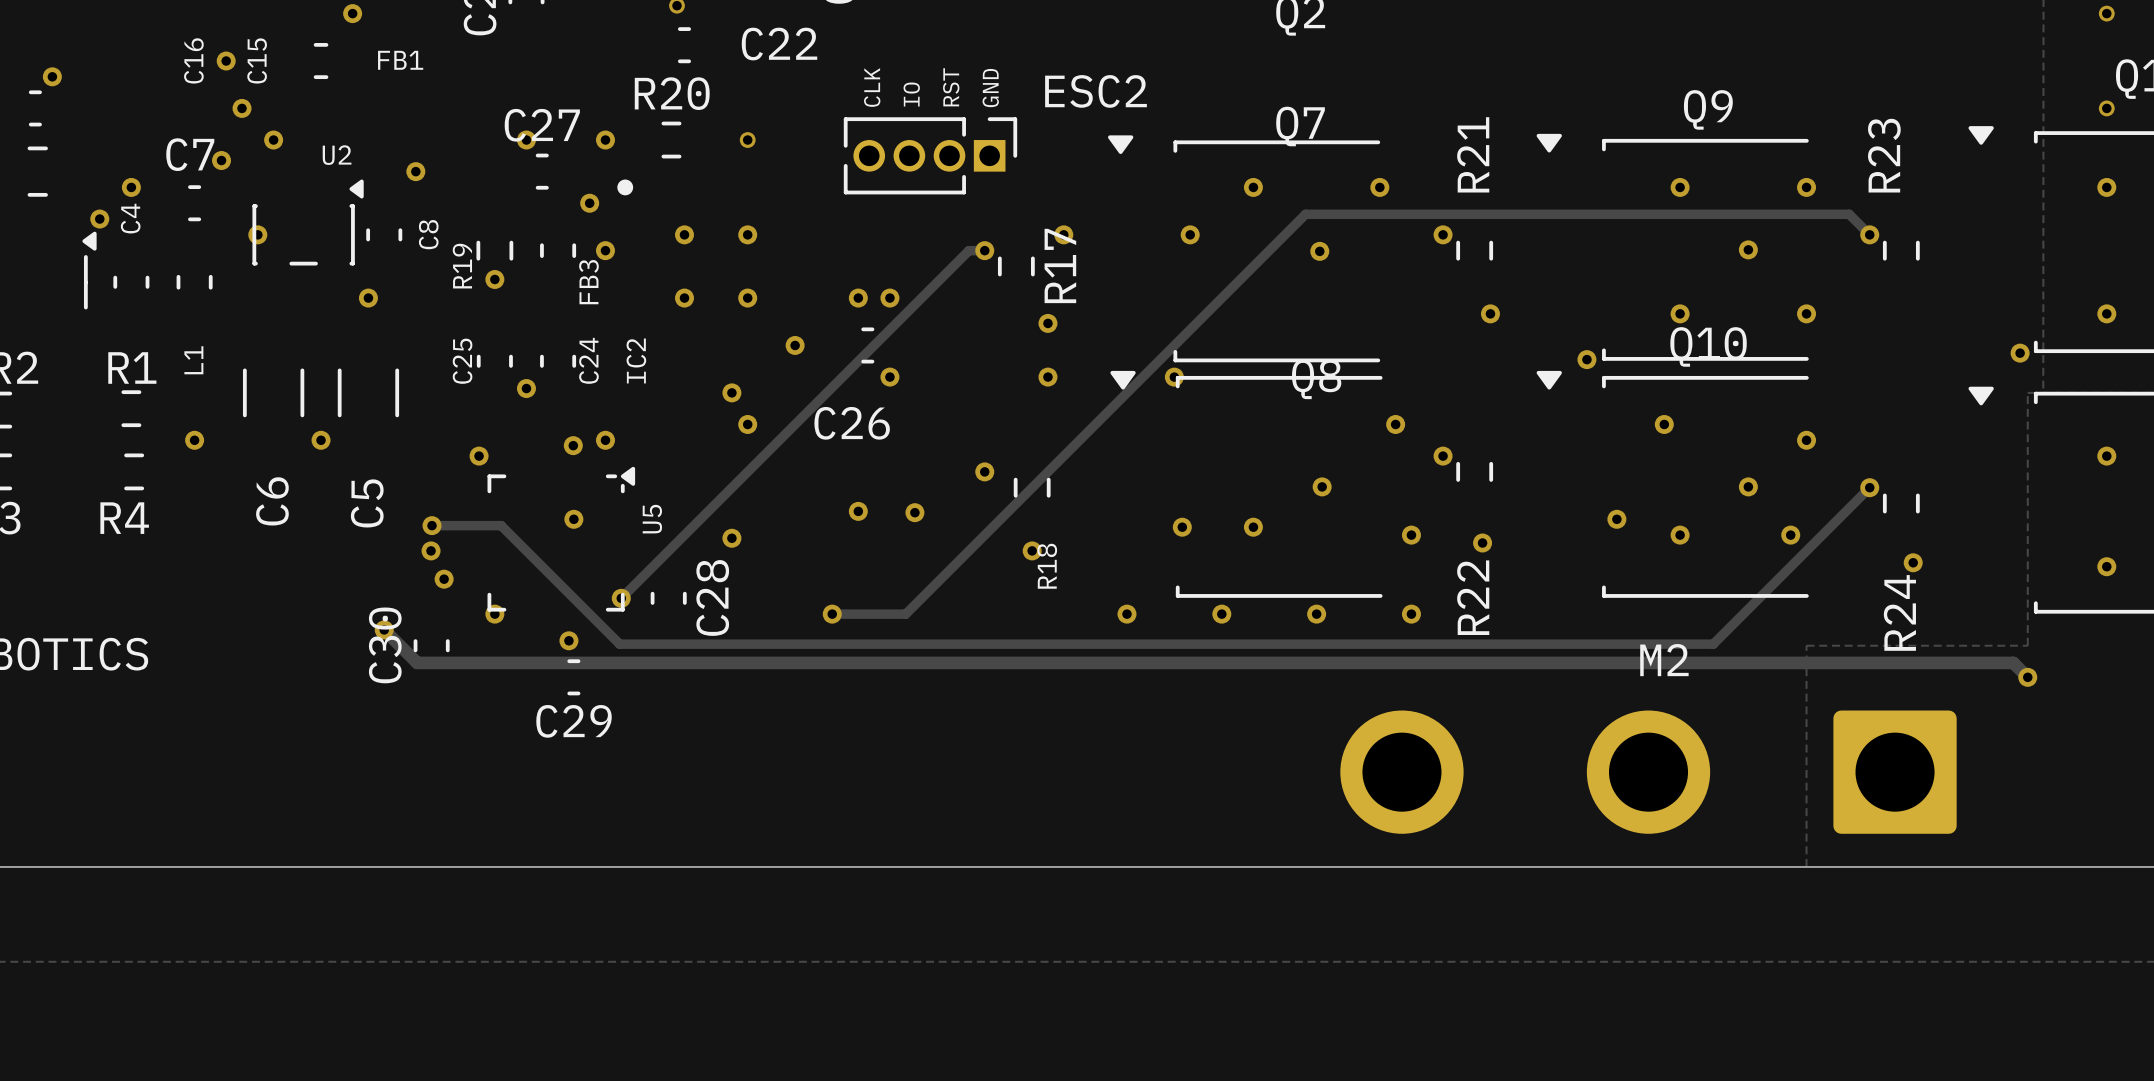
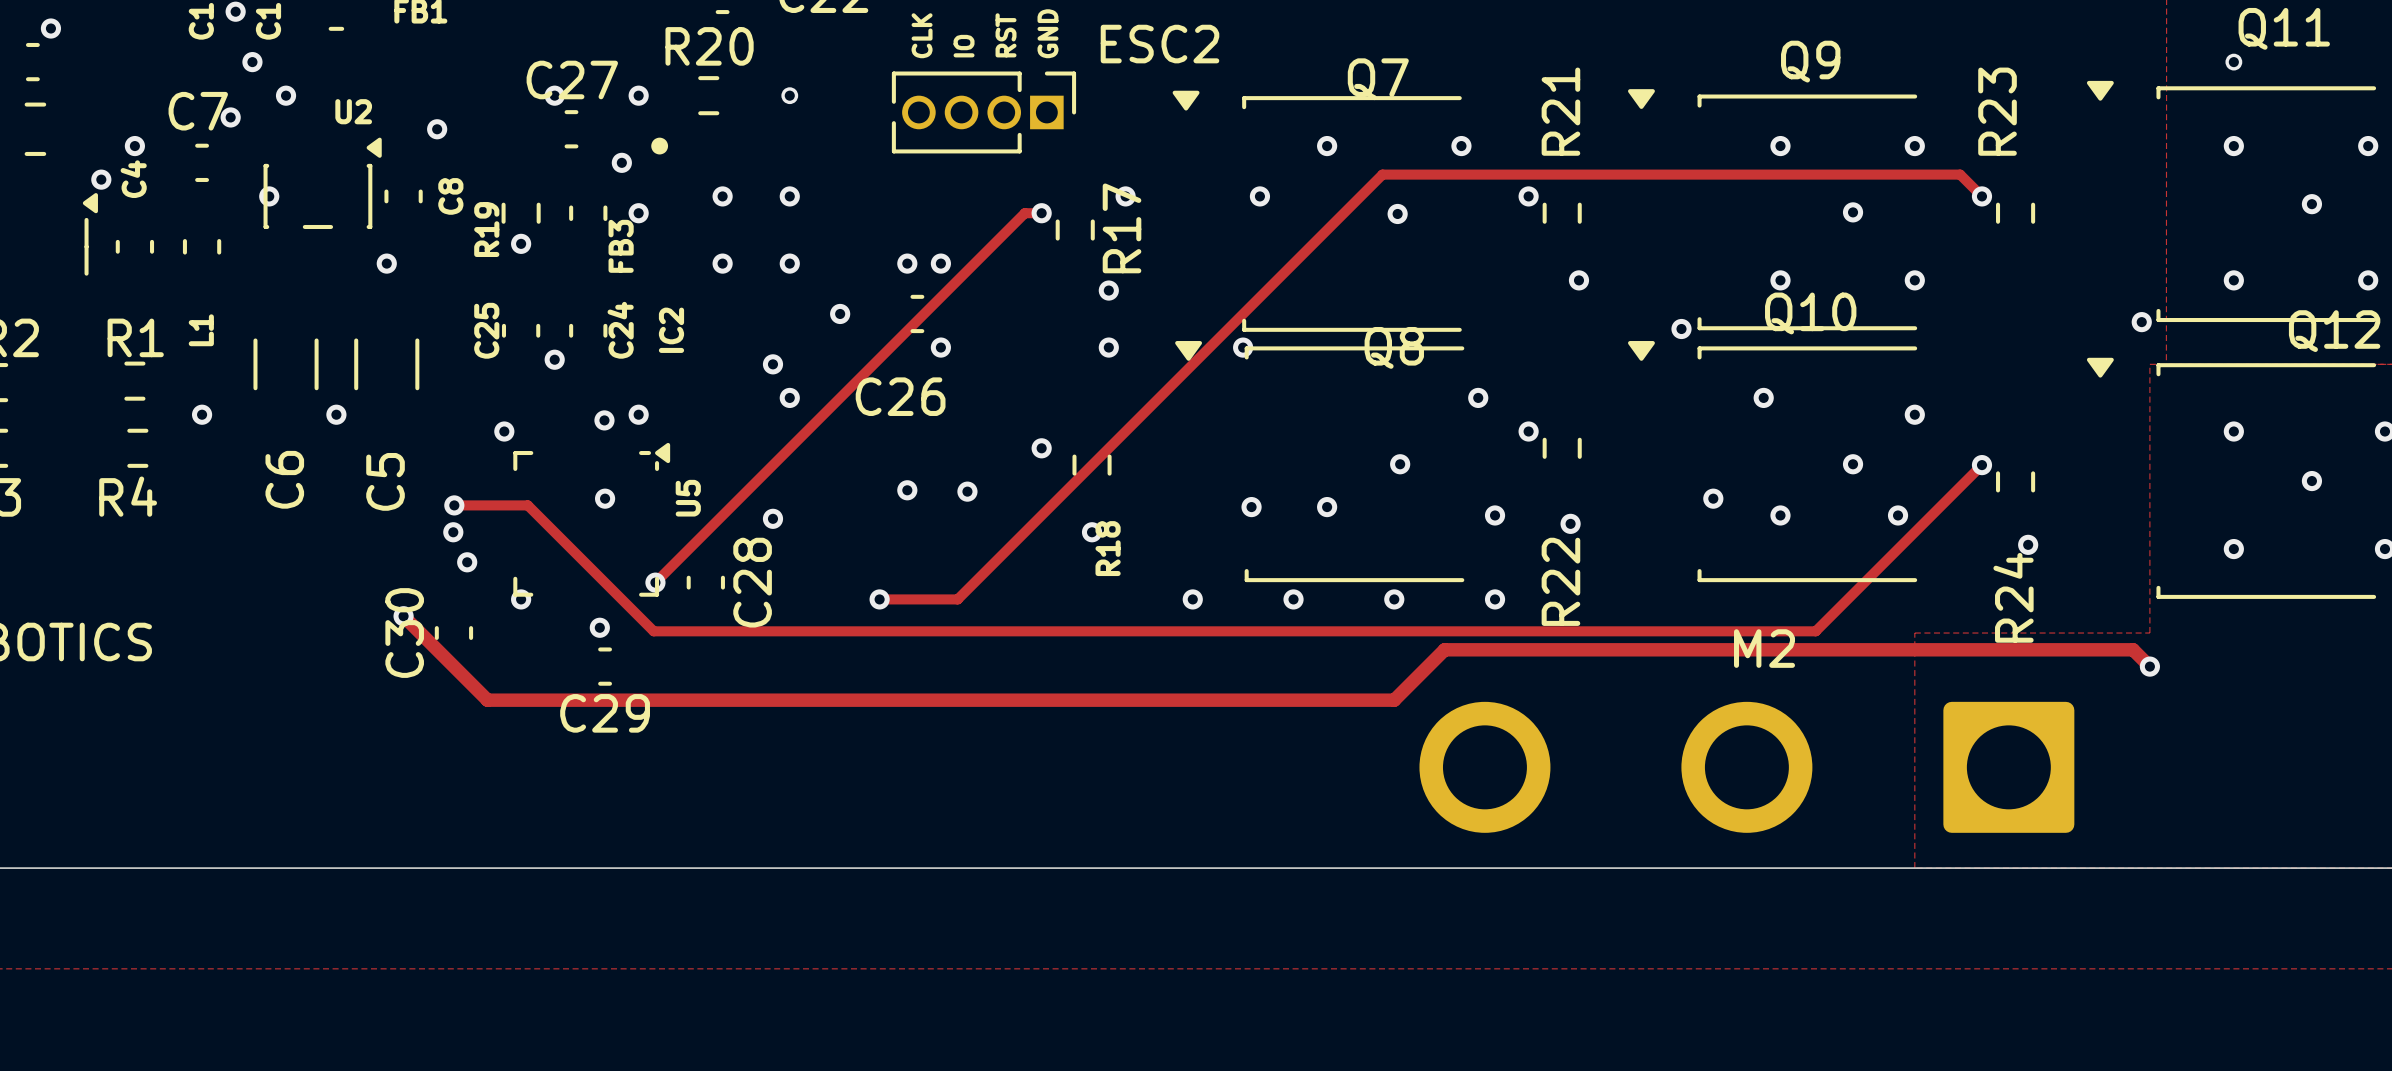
track: (417, 662) (2013, 662) -> (438, 651) (487, 700) (1394, 700) (1444, 649) (2134, 651)

